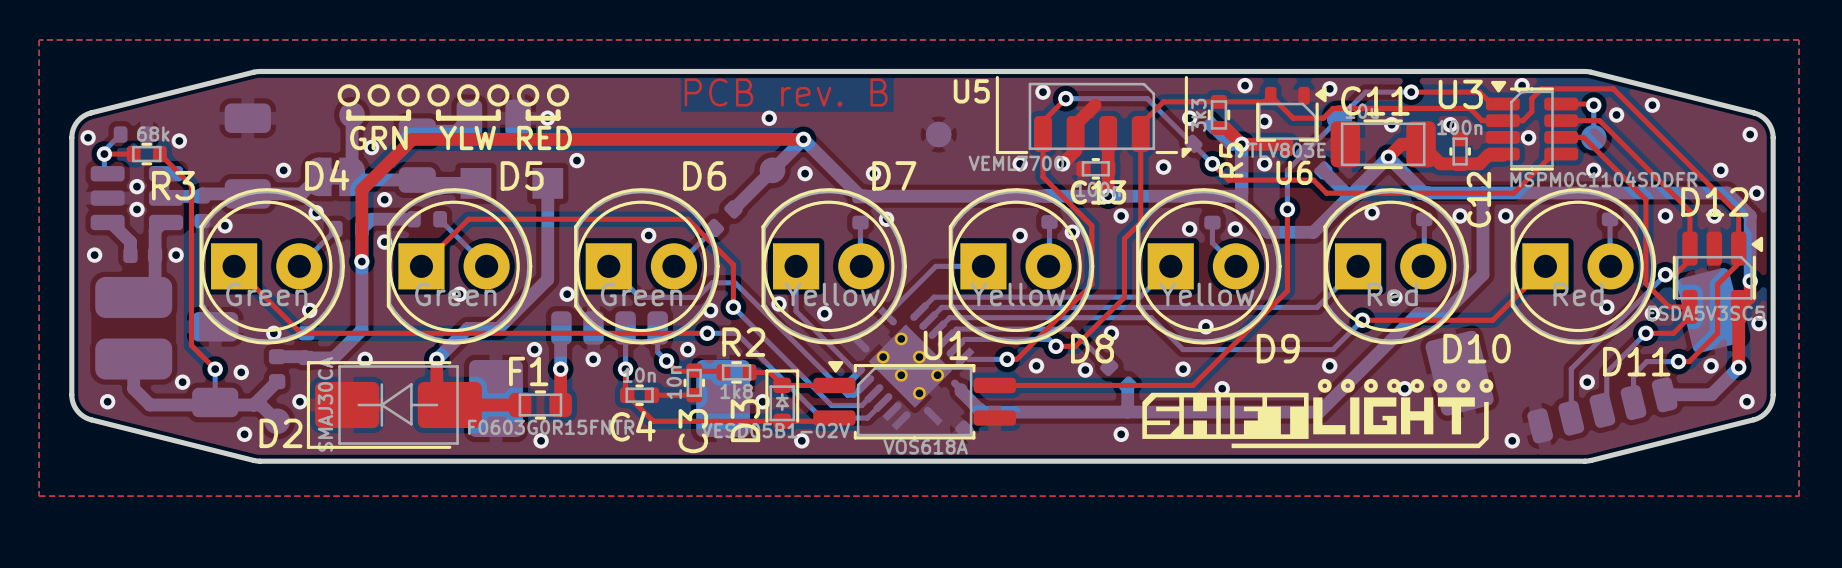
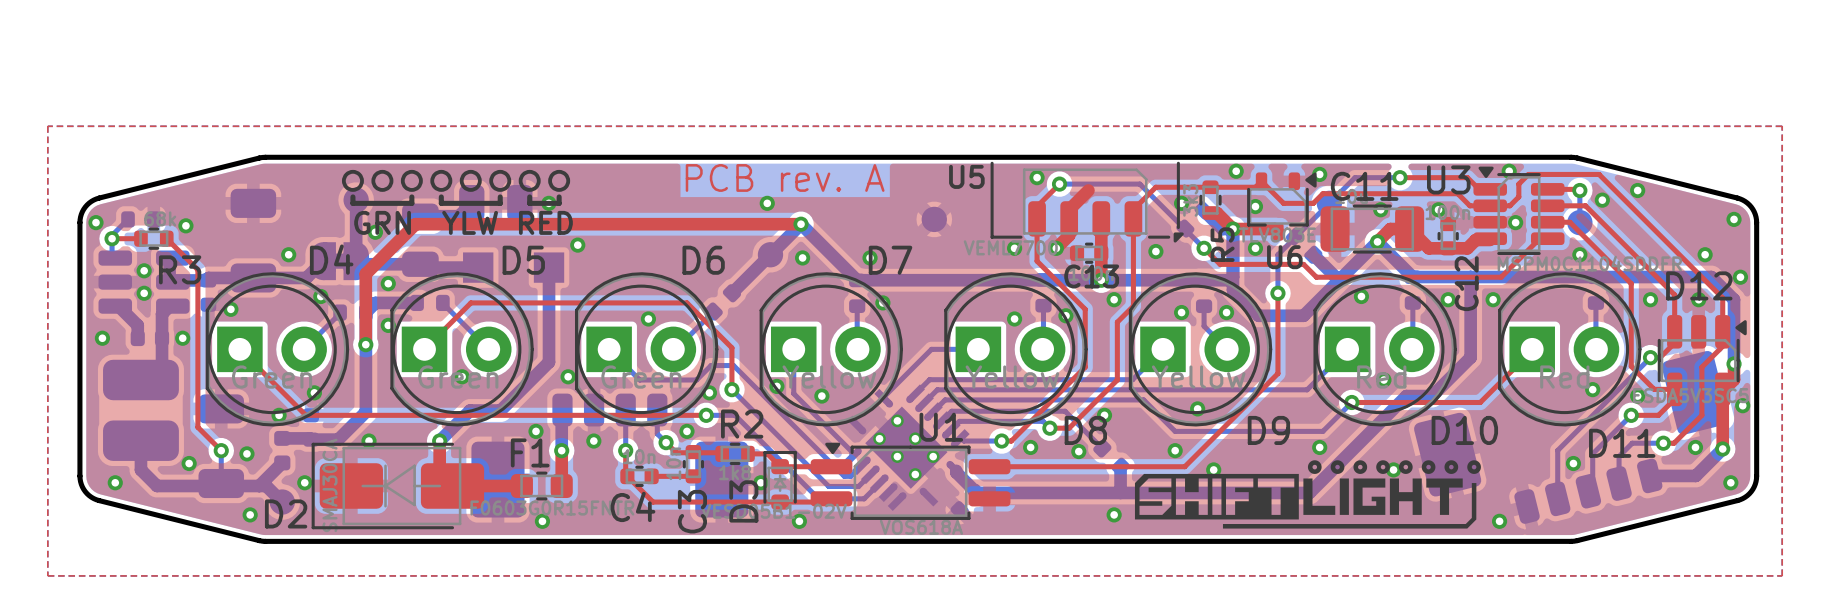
text: PCB rev. B (786, 92) -> PCB rev. A (785, 177)

